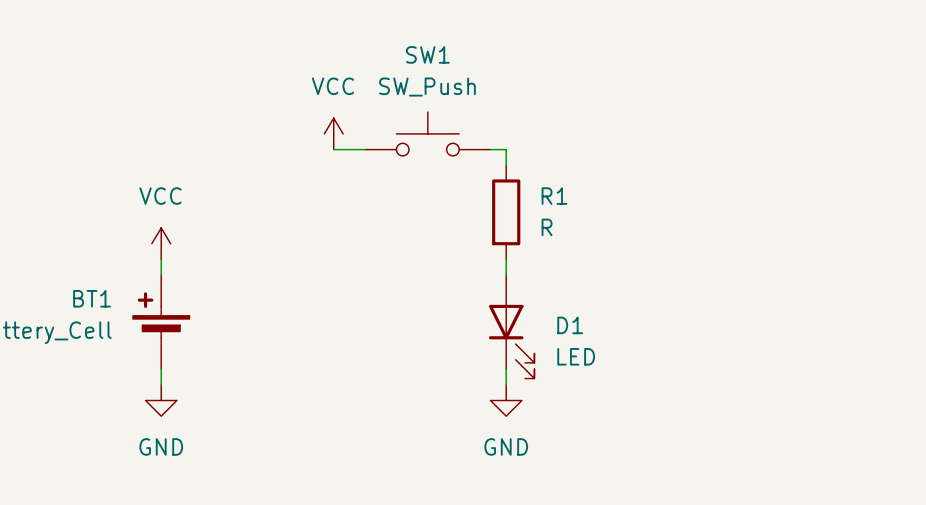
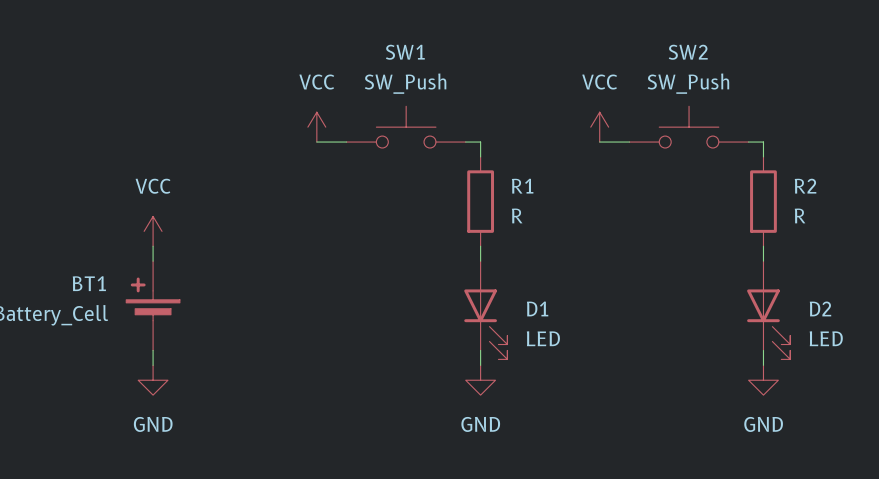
power symbol: none -> VCC (599, 127)
SW2: none -> SW_Push (689, 127)
wire: none -> (599, 142) (629, 142)
wire: none -> (748, 142) (763, 142) (763, 156)
R2: none -> R (763, 201)
wire: none -> (763, 246) (763, 261)
D2: none -> LED (768, 310)
wire: none -> (763, 350) (763, 365)
power symbol: none -> GND (763, 380)

